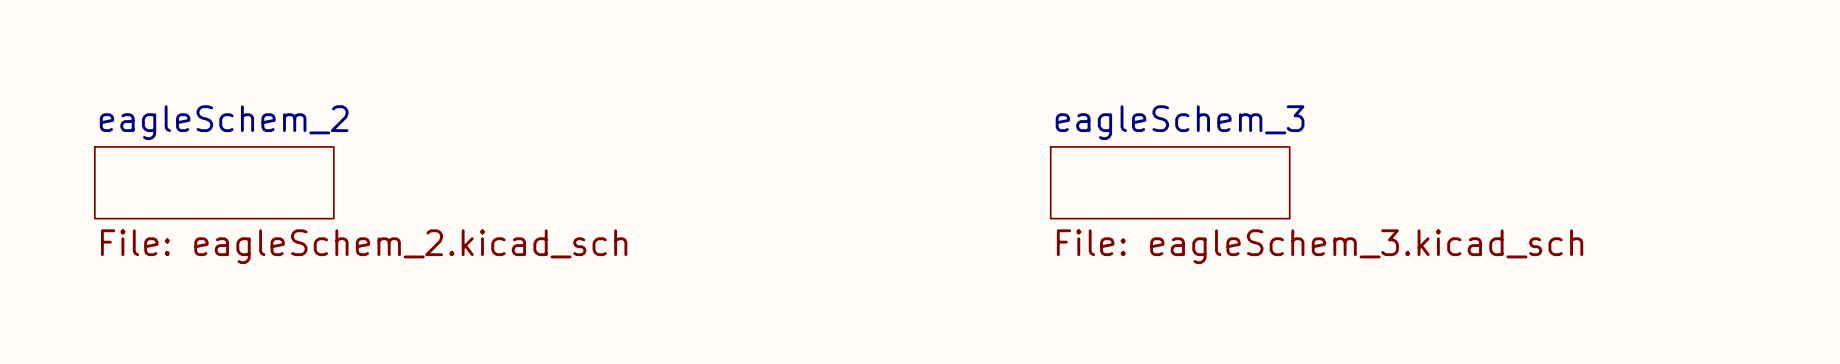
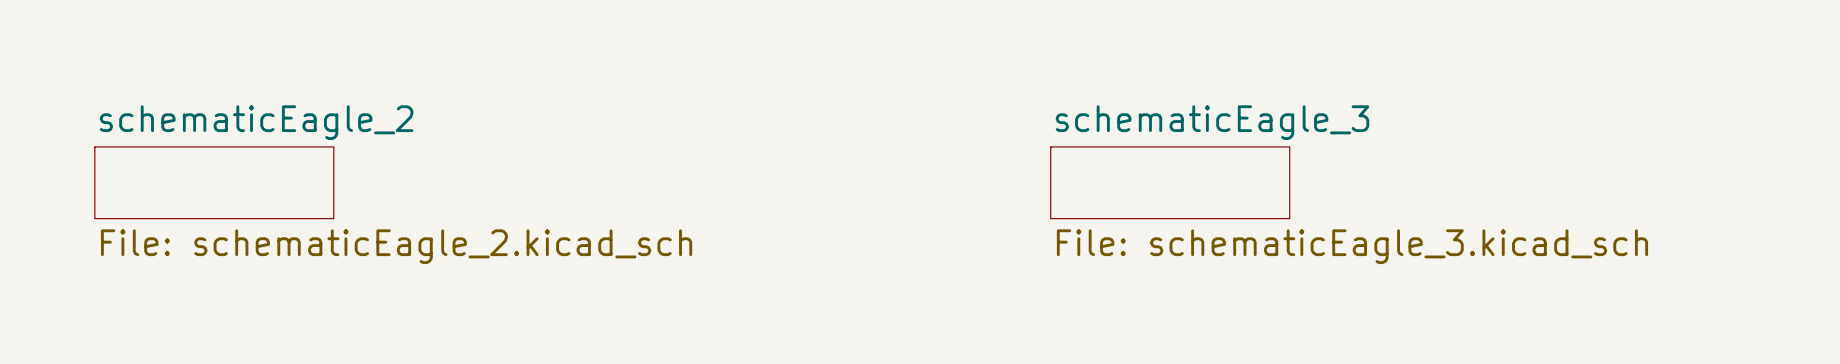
sheet eagleSchem_2 name: eagleSchem_2 (224, 122) -> schematicEagle_2 (256, 122)
sheet eagleSchem_3 name: eagleSchem_3 (1180, 122) -> schematicEagle_3 (1212, 122)
sheet eagleSchem_2 value: File: eagleSchem_2.kicad_sch (364, 246) -> File: schematicEagle_2.kicad_sch (396, 246)
sheet eagleSchem_3 value: File: eagleSchem_3.kicad_sch (1320, 246) -> File: schematicEagle_3.kicad_sch (1352, 246)

